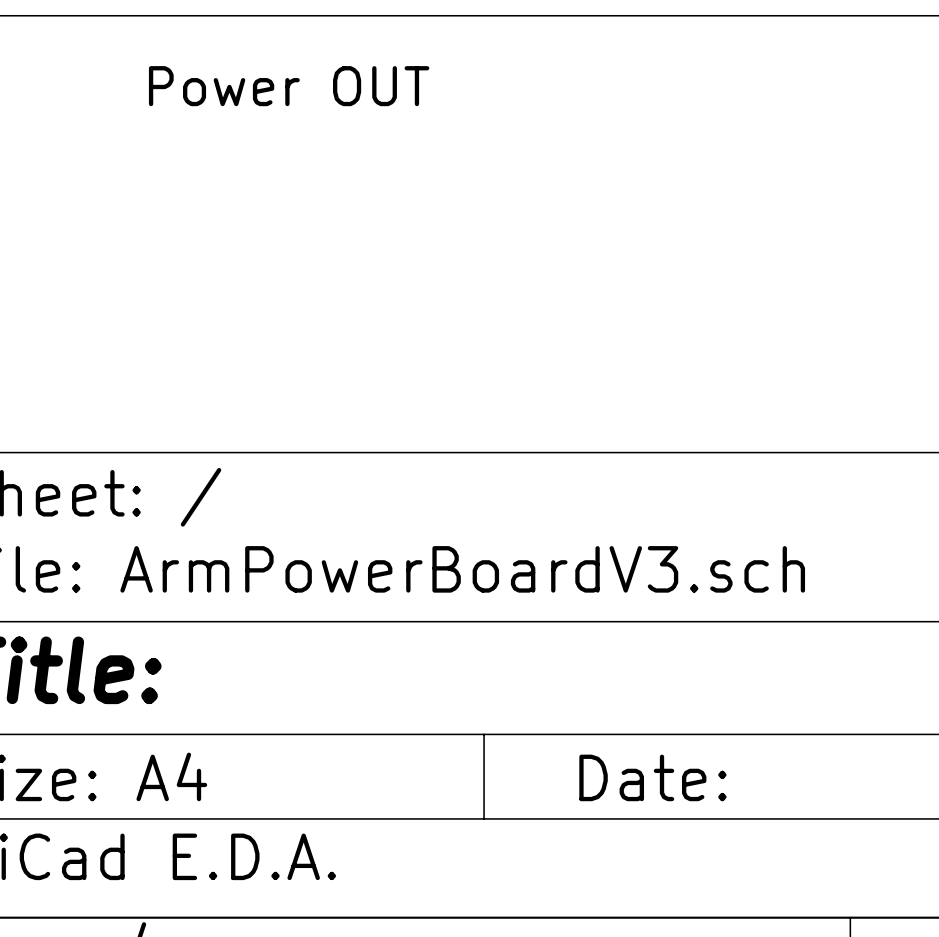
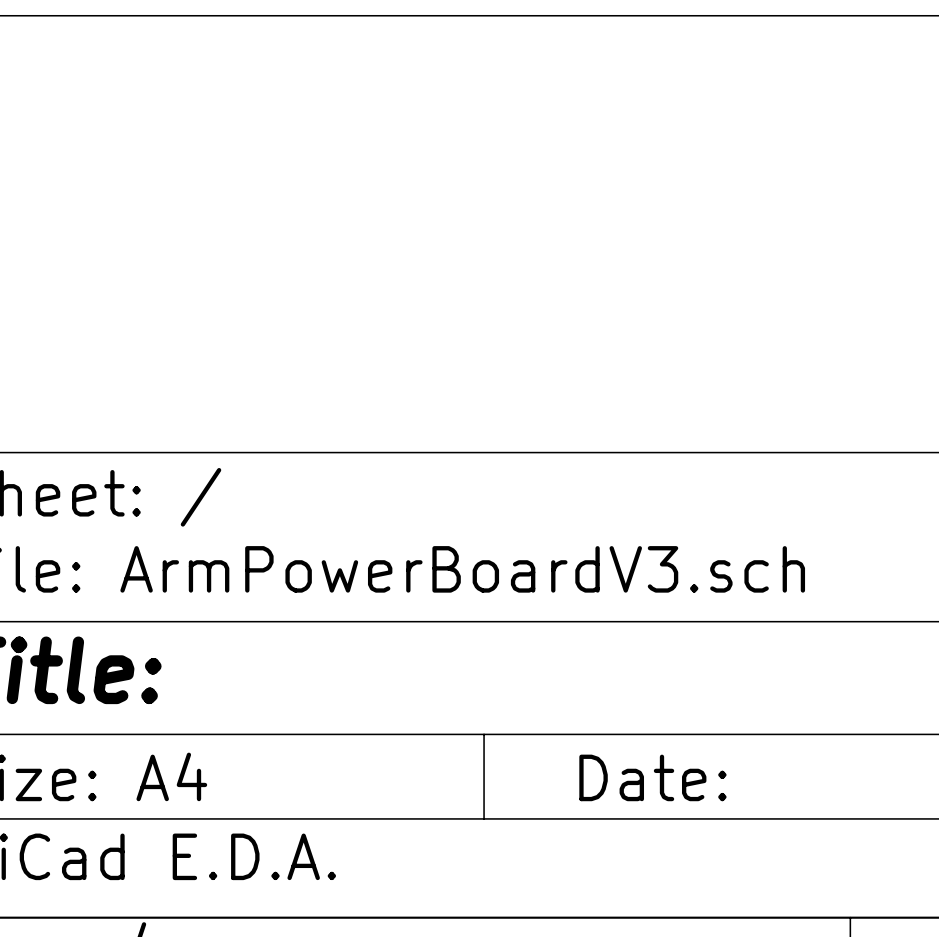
text: Power OUT (289, 86) -> none

